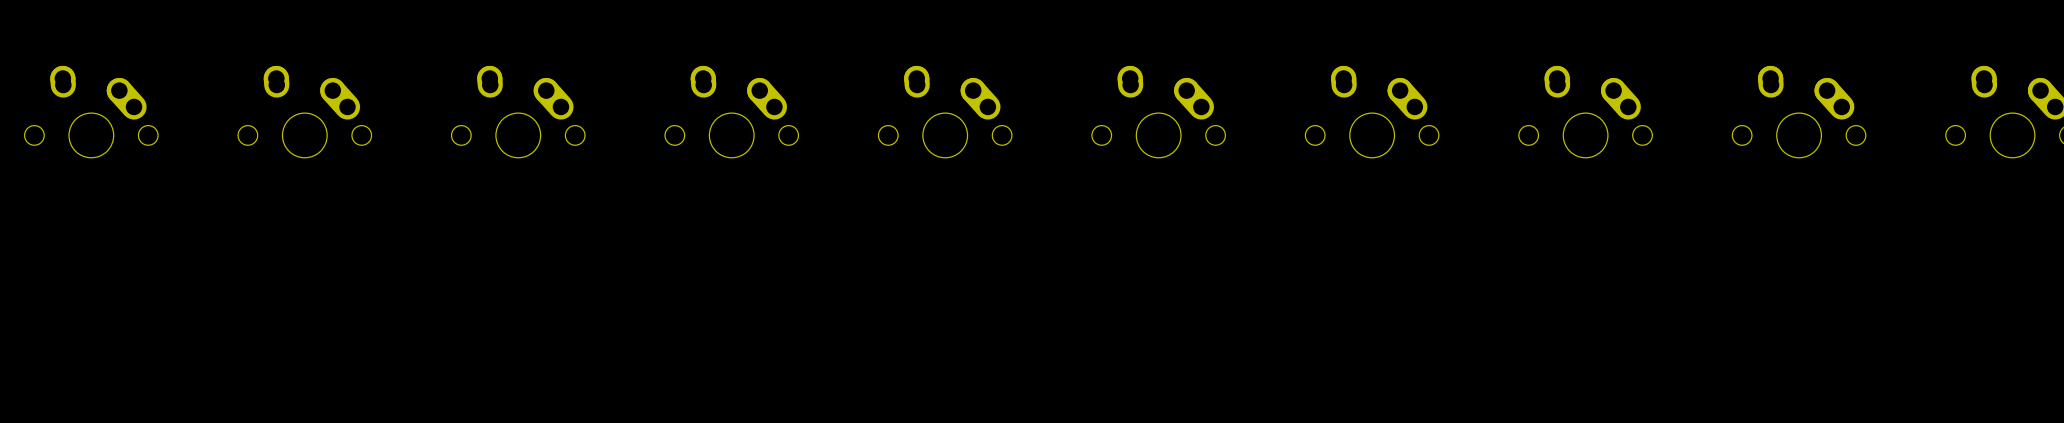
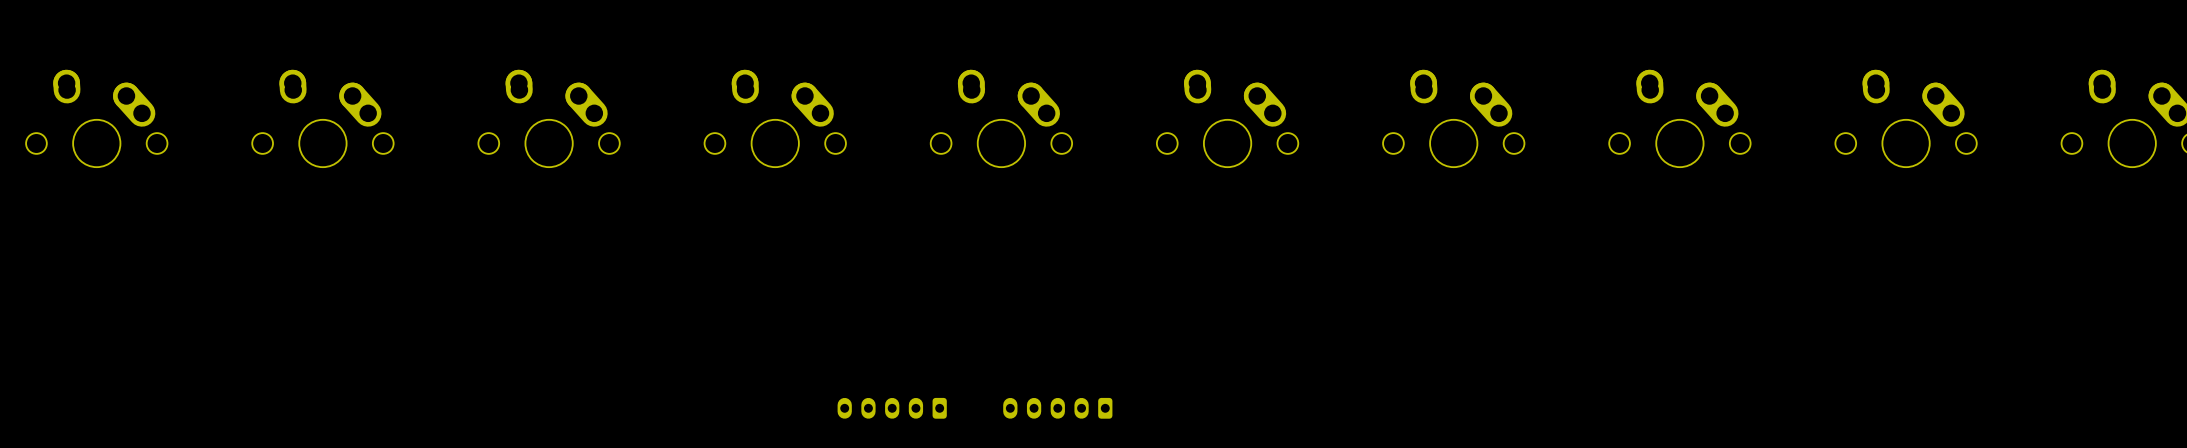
part: none -> (892, 408)
part: none -> (1057, 408)

